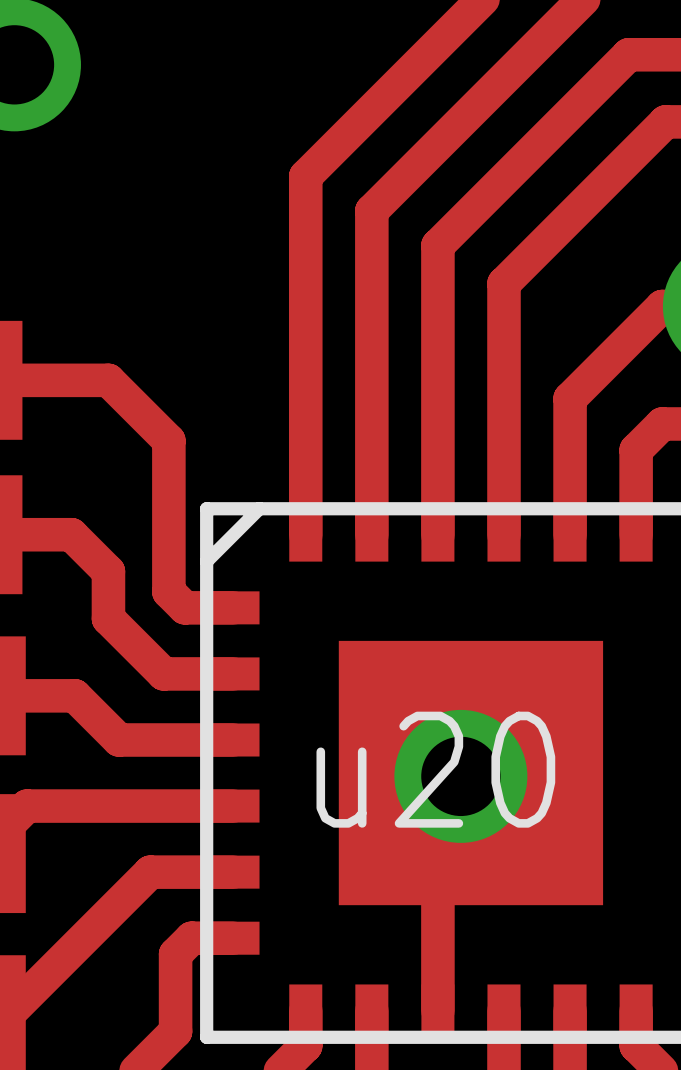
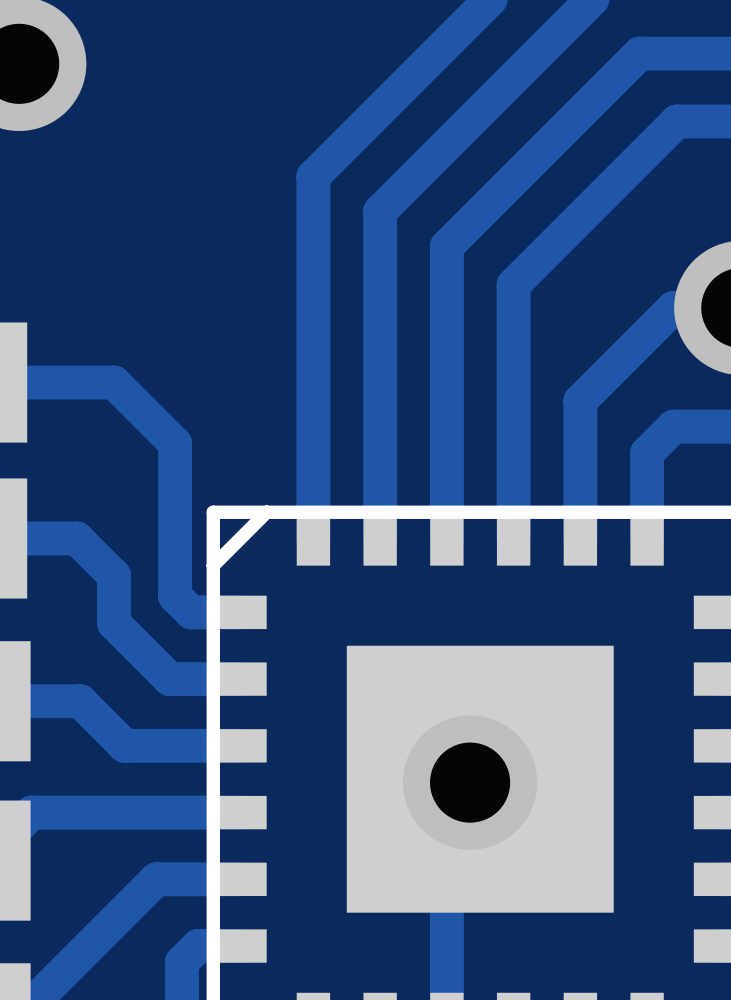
text: u20 (435, 769) -> none

